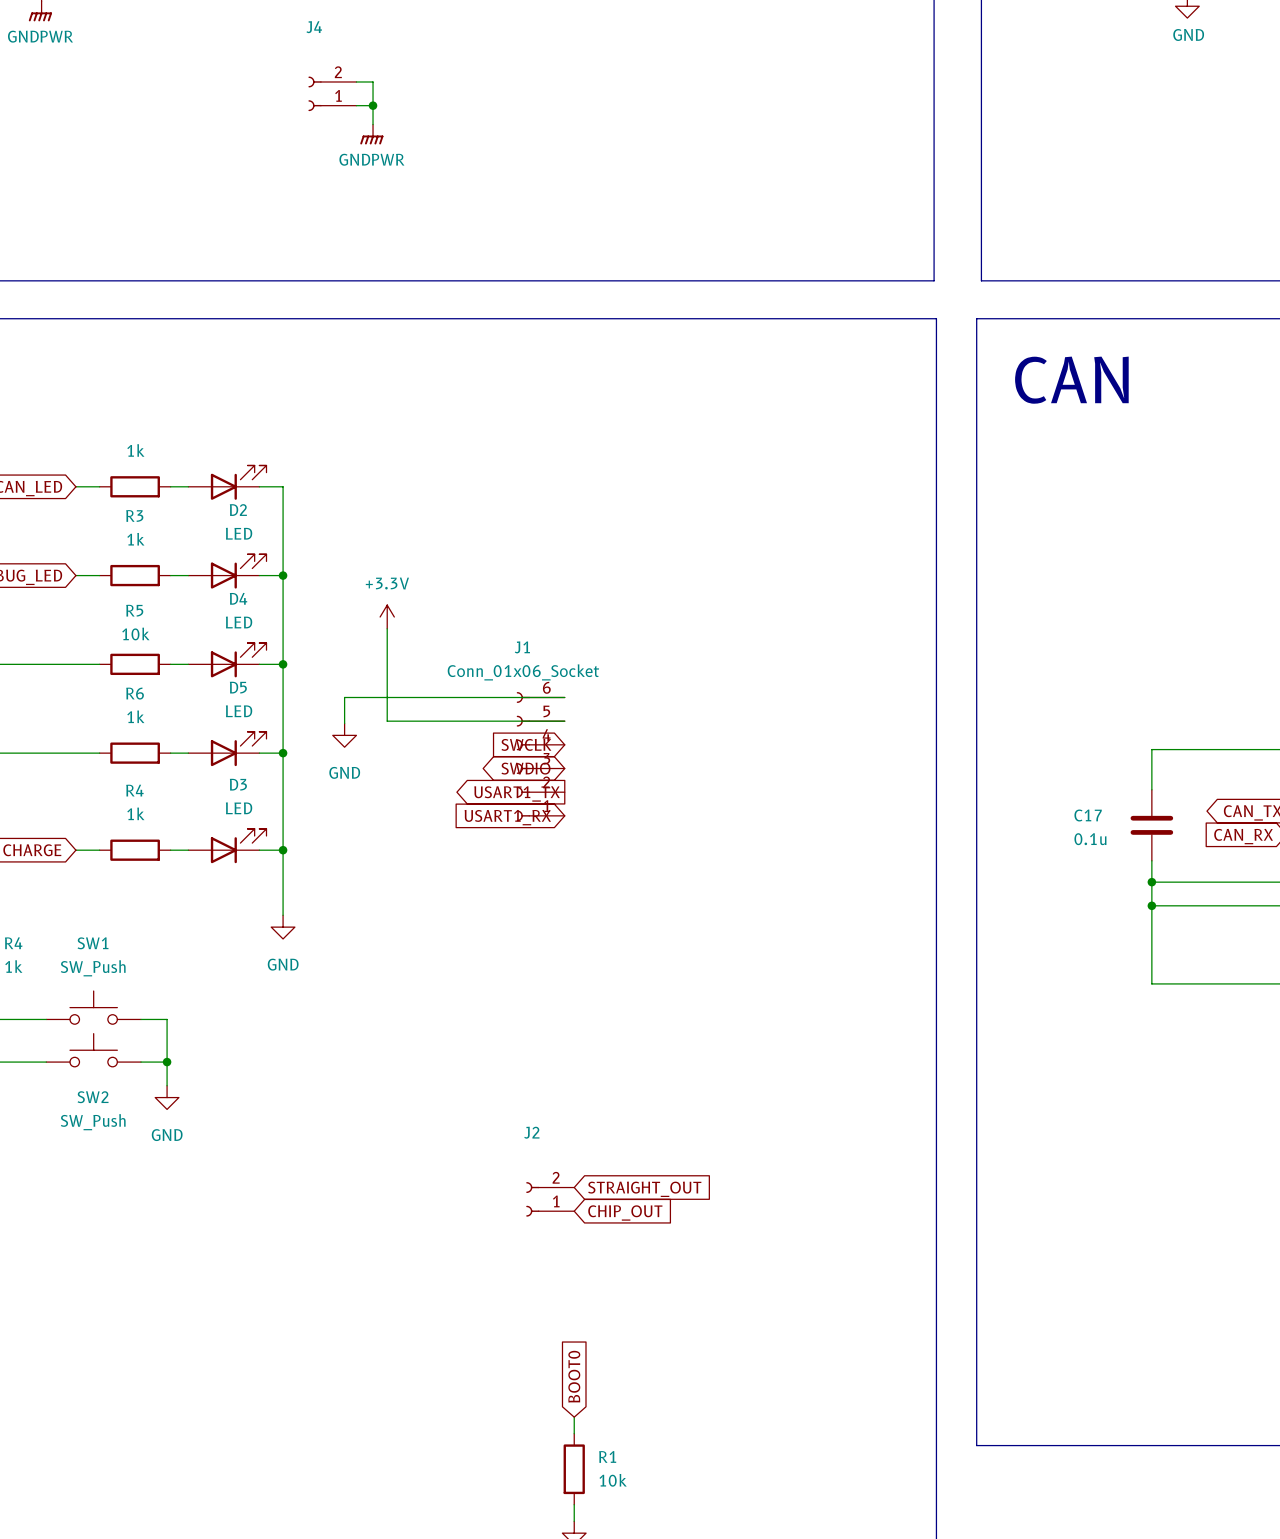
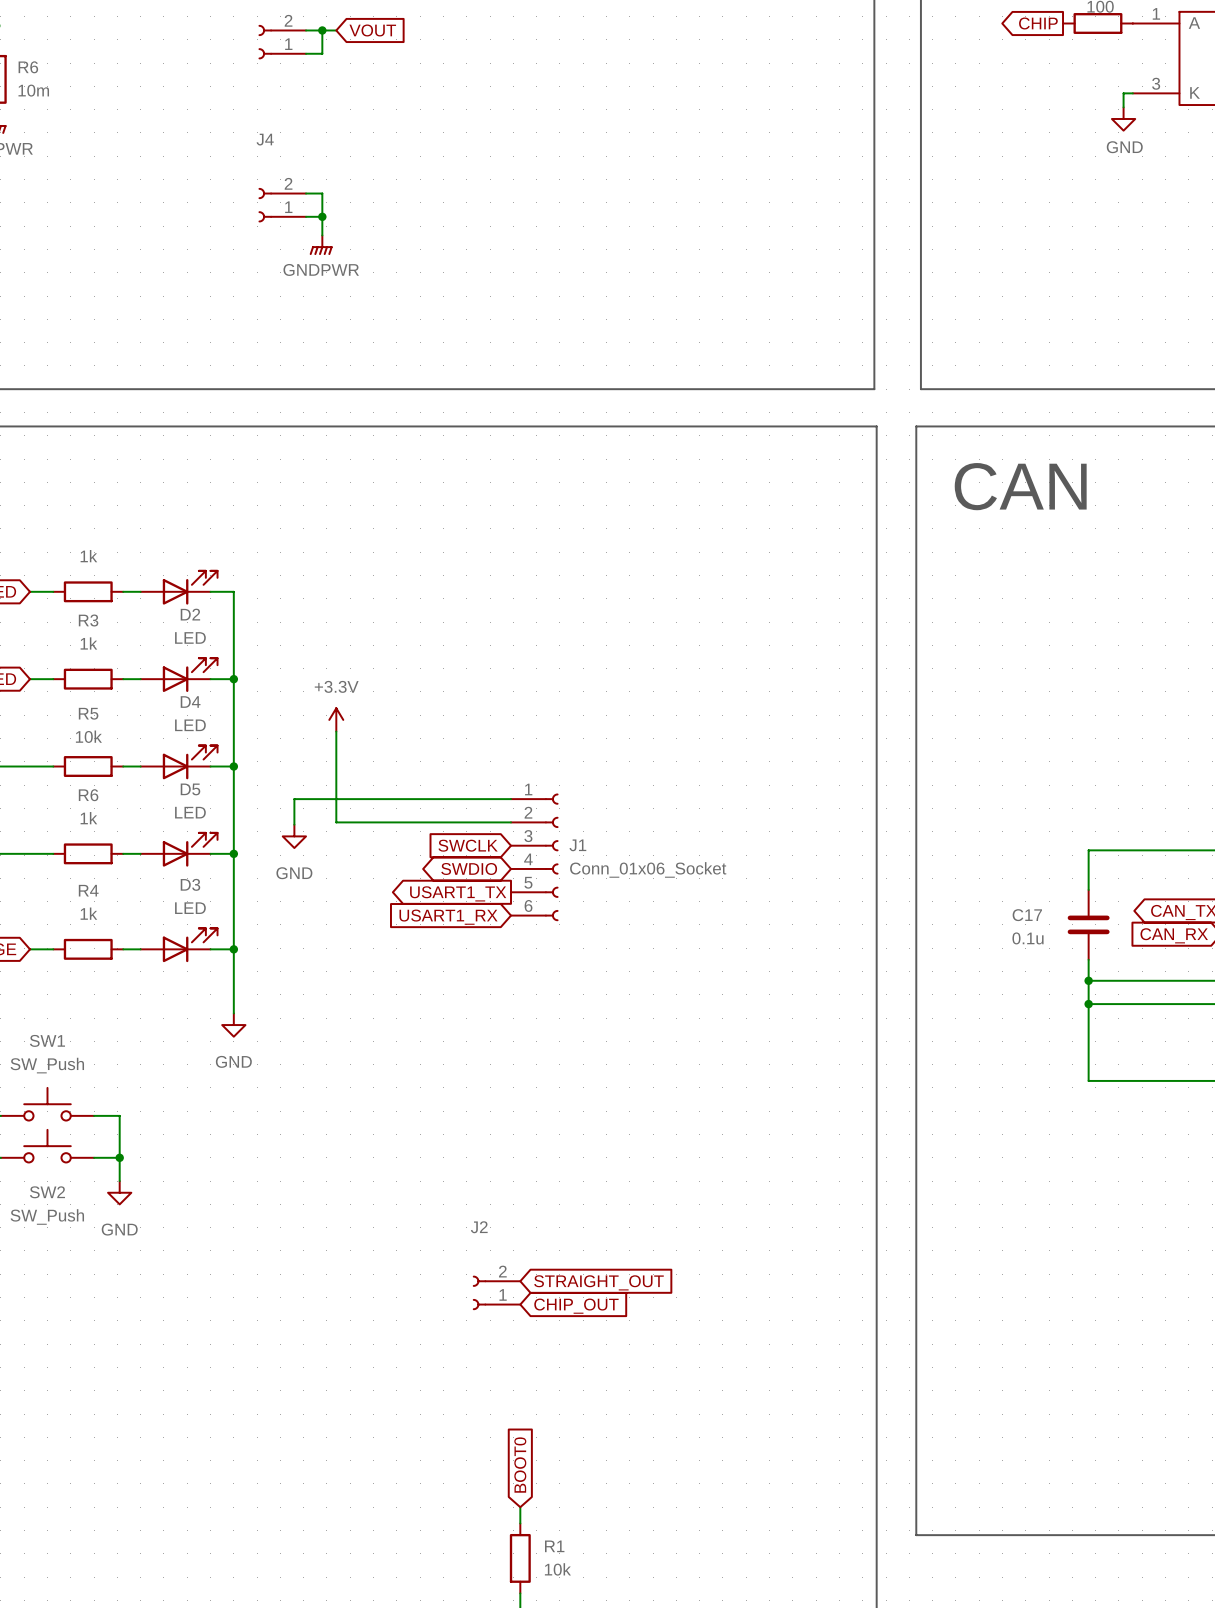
J1 name position: J1 (522, 647) -> J1 (577, 845)
J1 value position: Conn_01x06_Socket (523, 672) -> Conn_01x06_Socket (648, 869)
J1 rotation: 0° (523, 756) -> 180° (551, 857)

